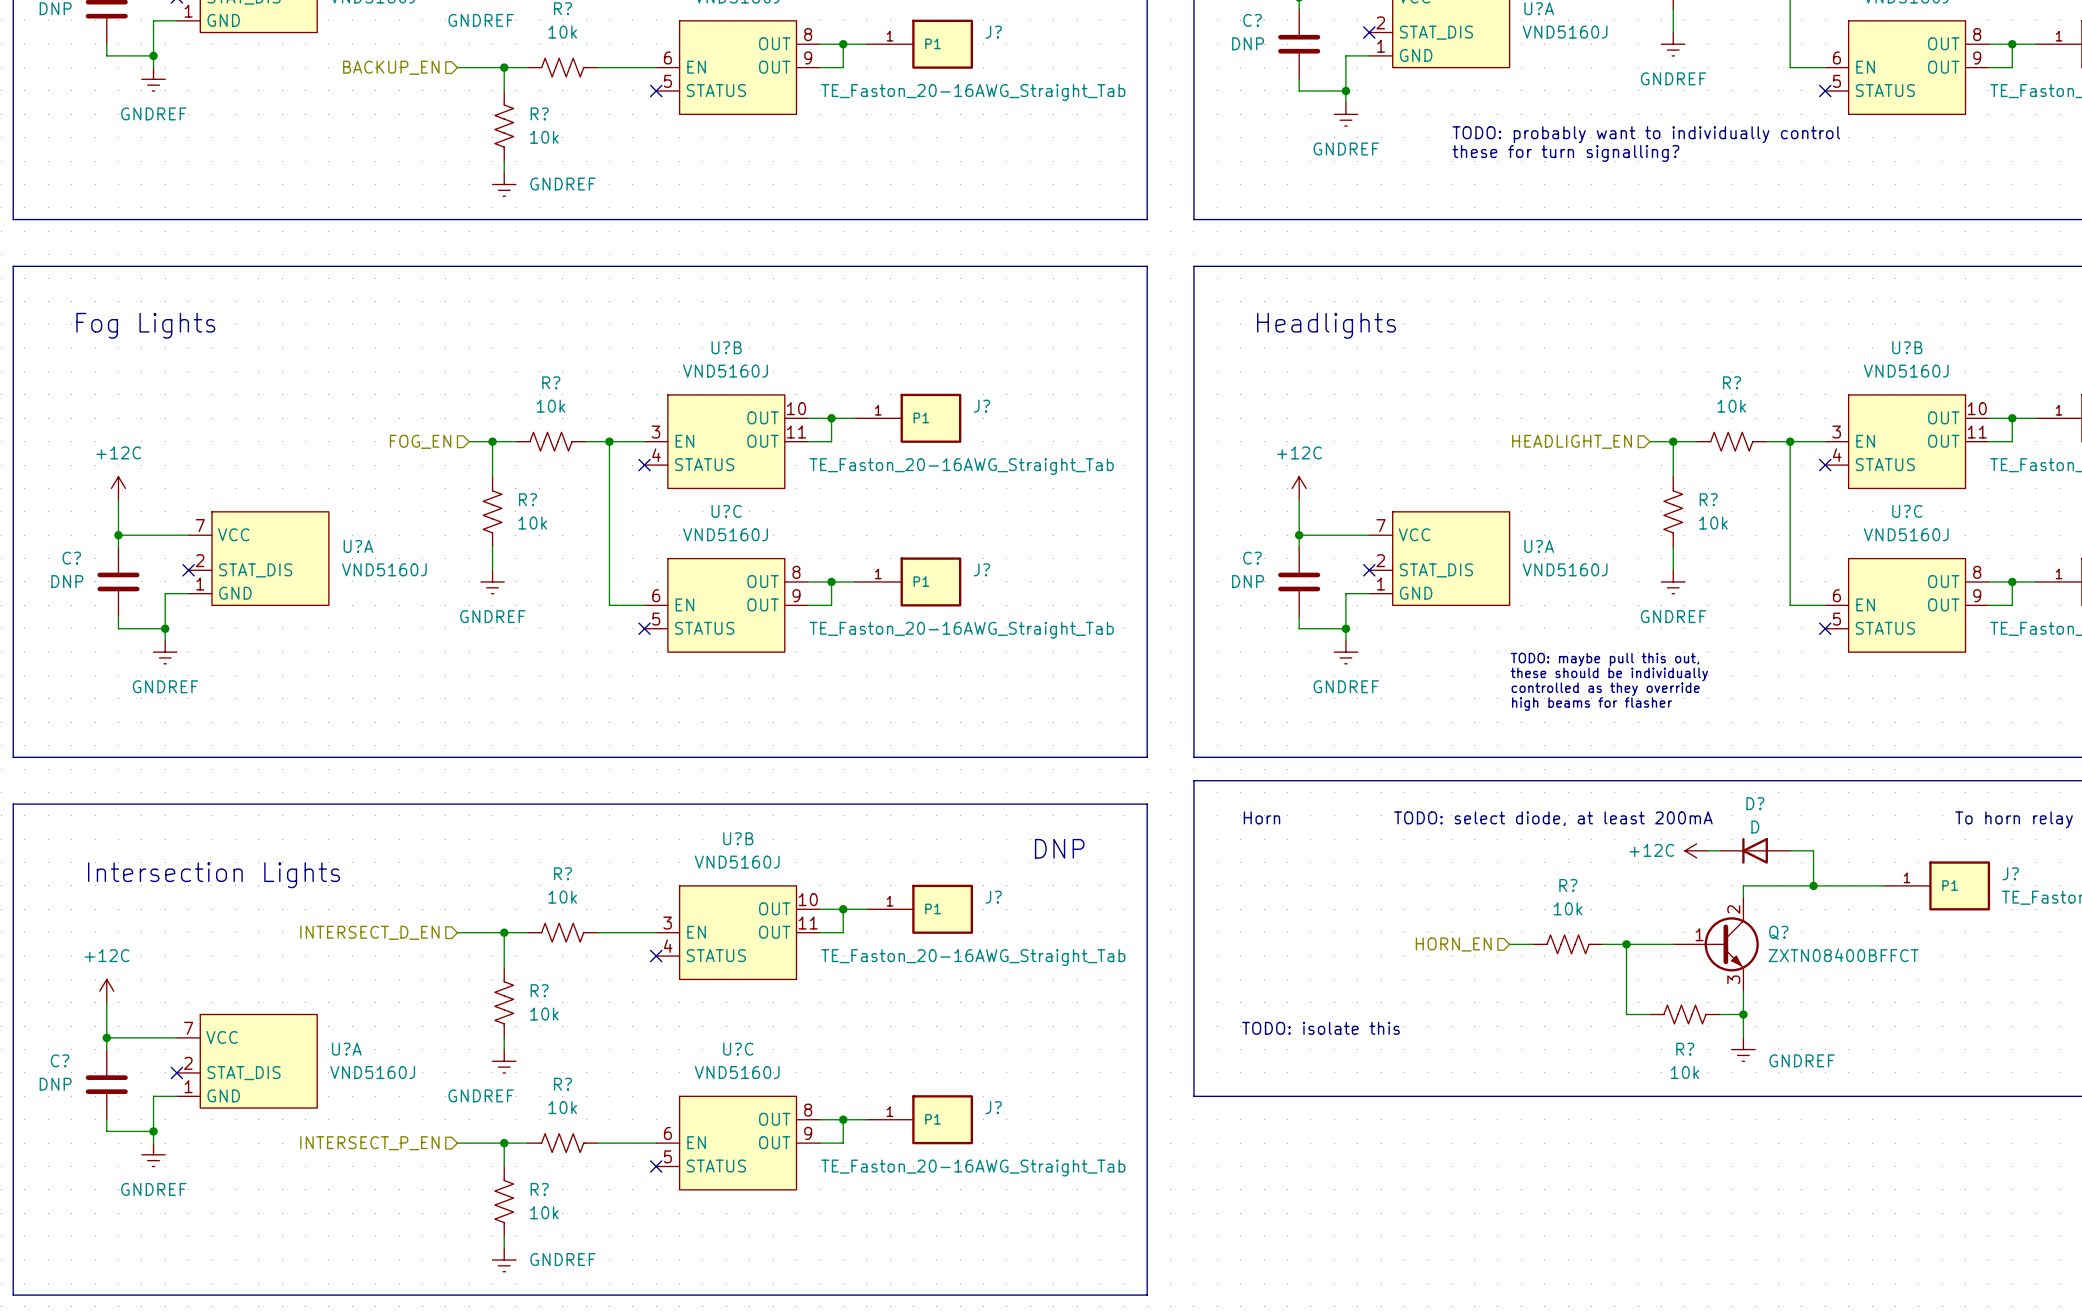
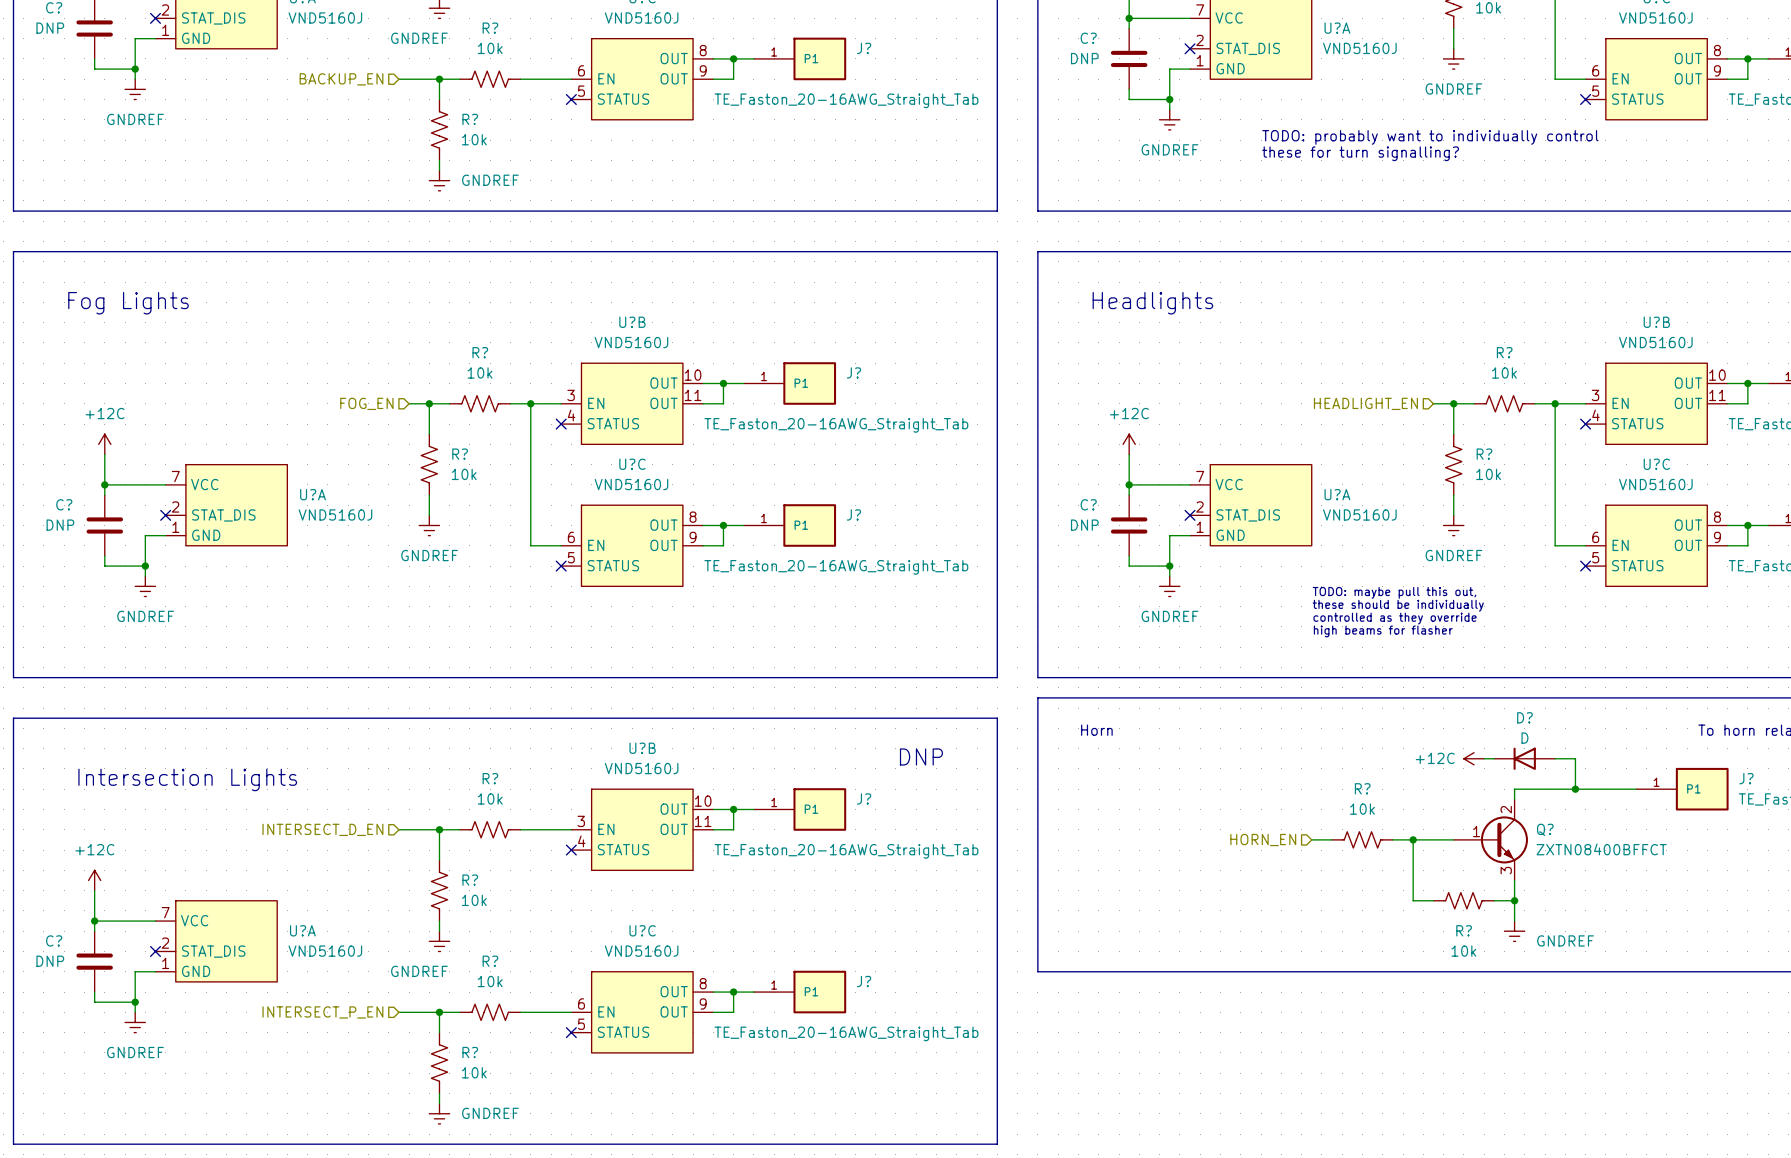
text: TODO: select diode, at least 200mA (1553, 818) -> none
text: TODO: isolate this (1320, 1028) -> none

